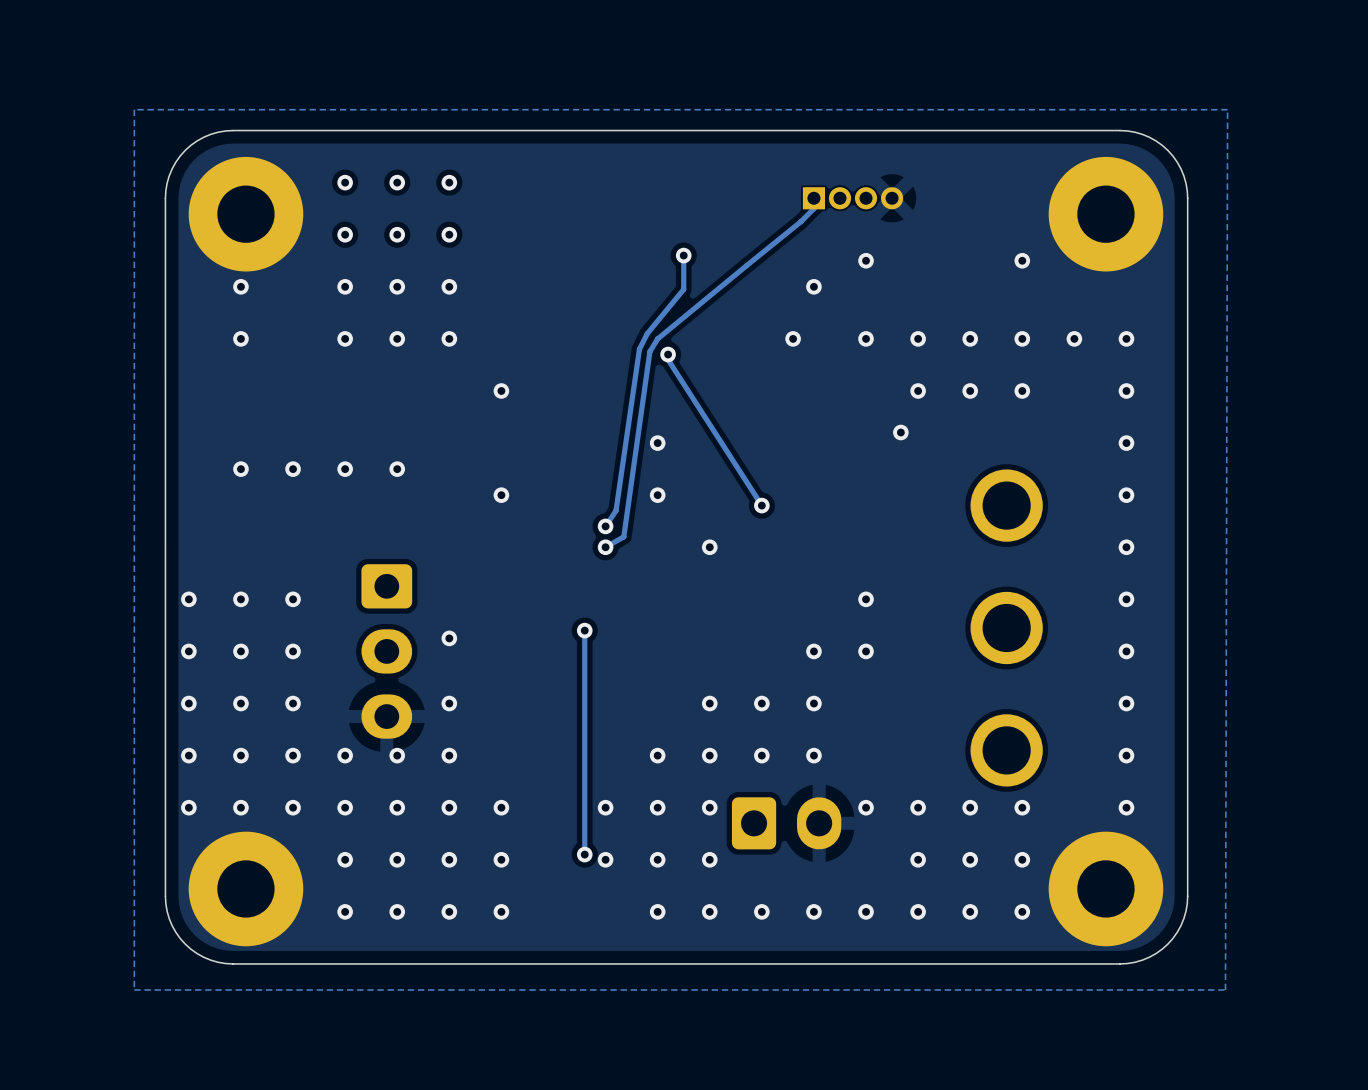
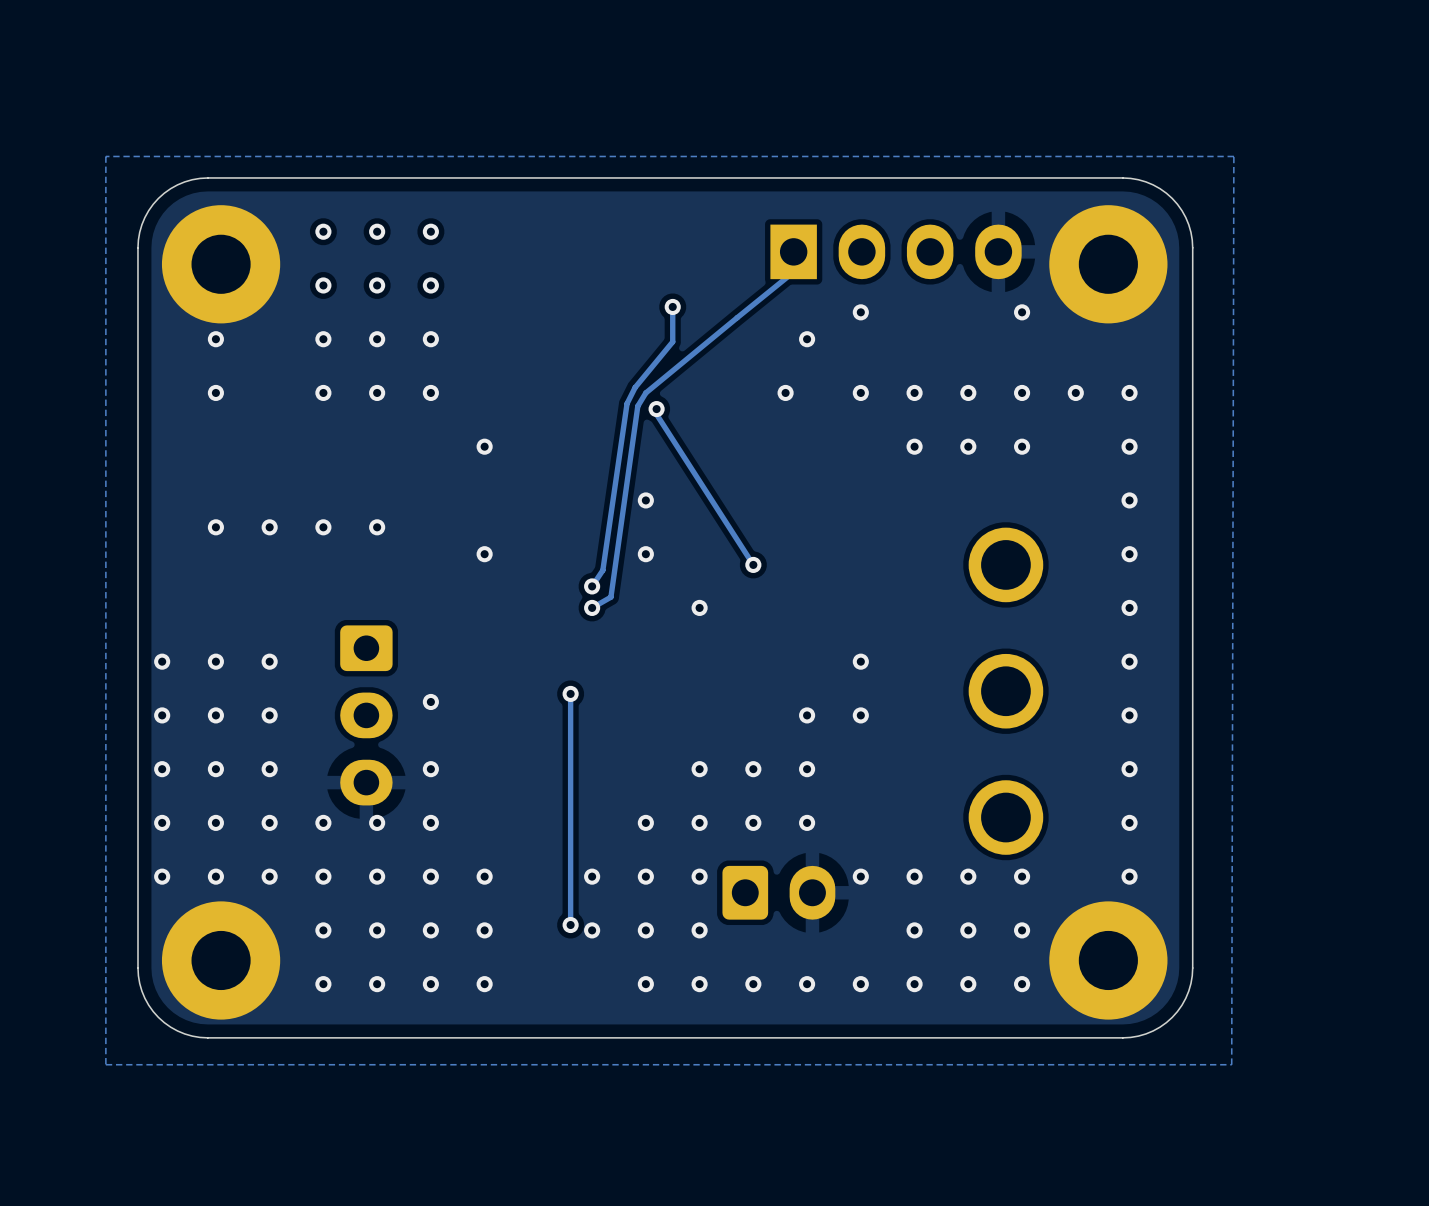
track: (813, 198) (813, 208) (800, 221) -> none
part: (853, 198) -> none
part: none -> (896, 251)
via: (900, 432) -> none

